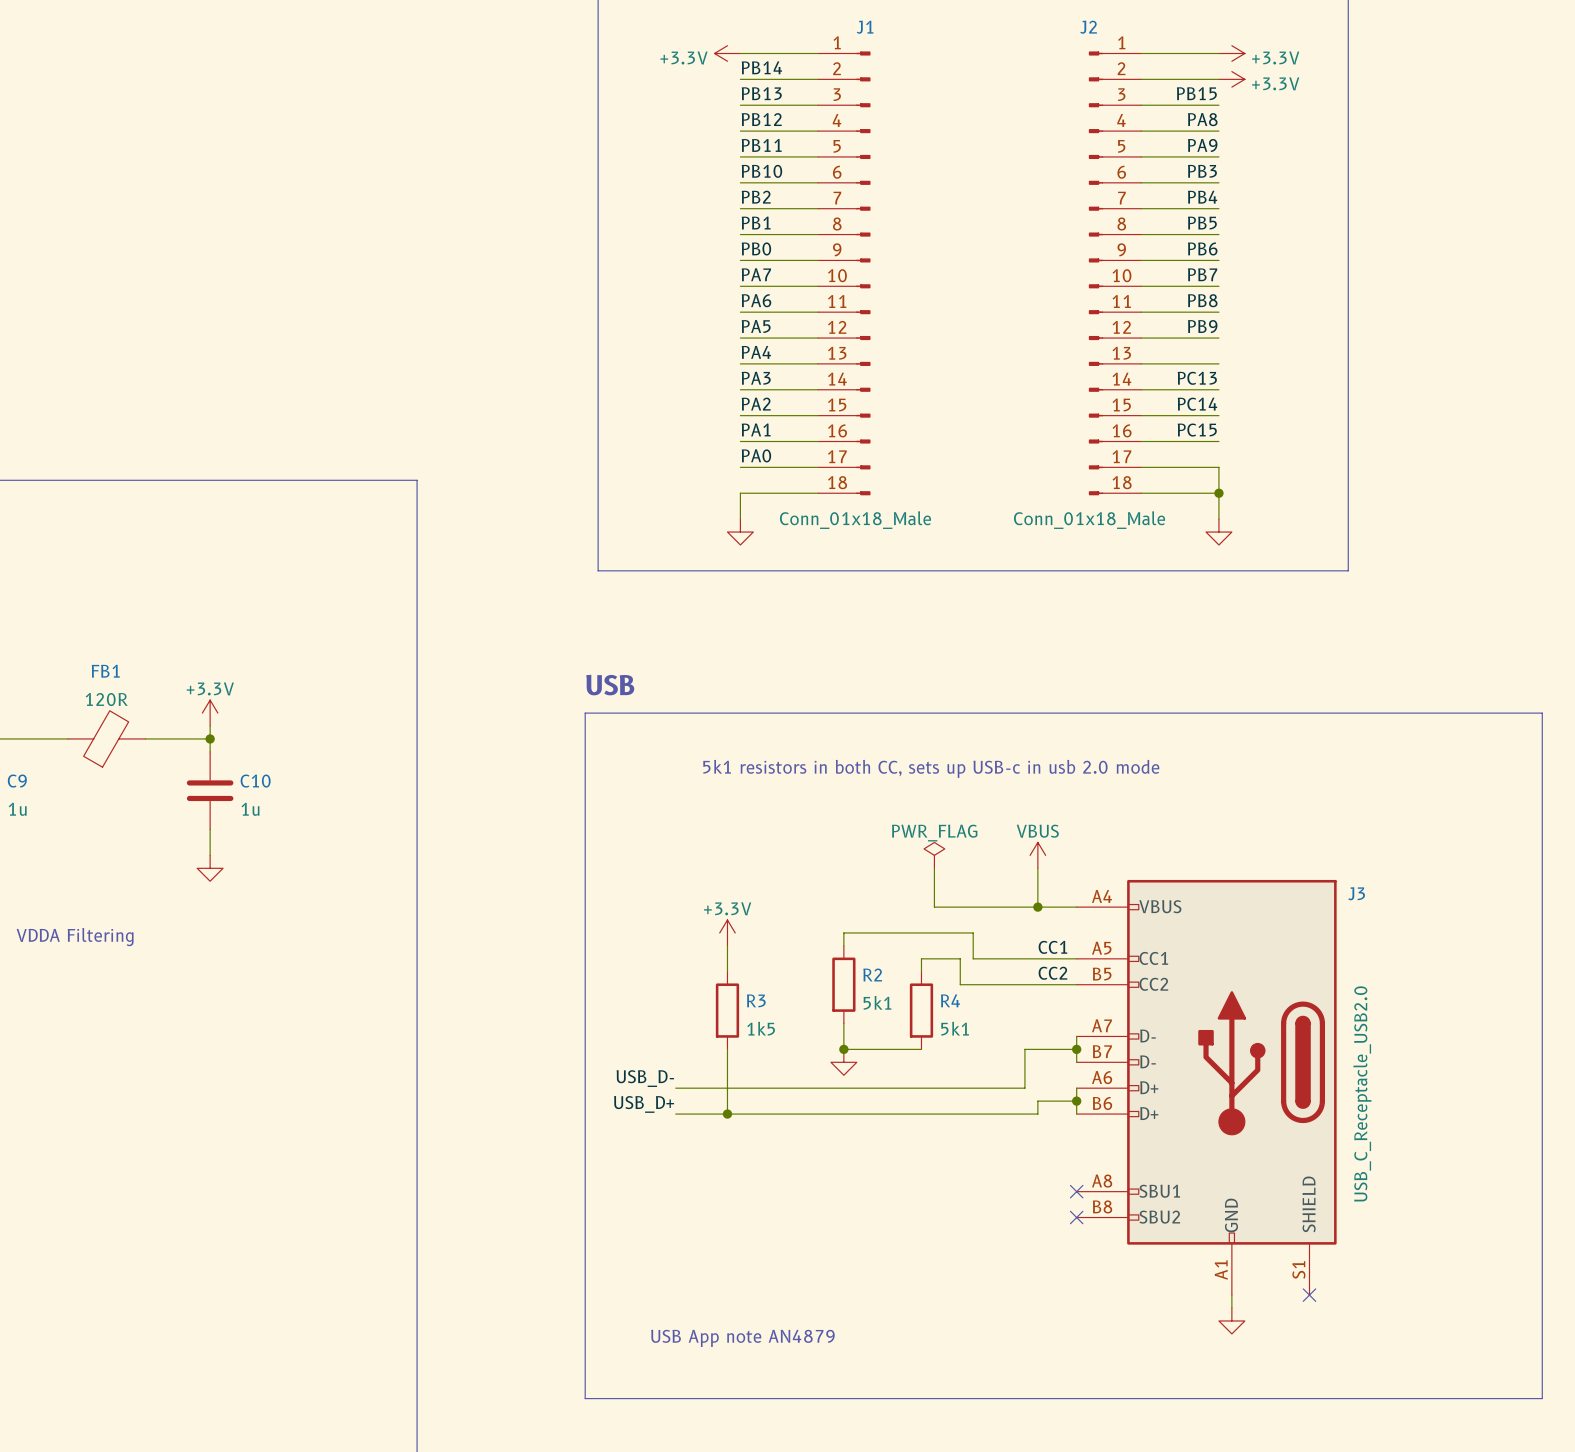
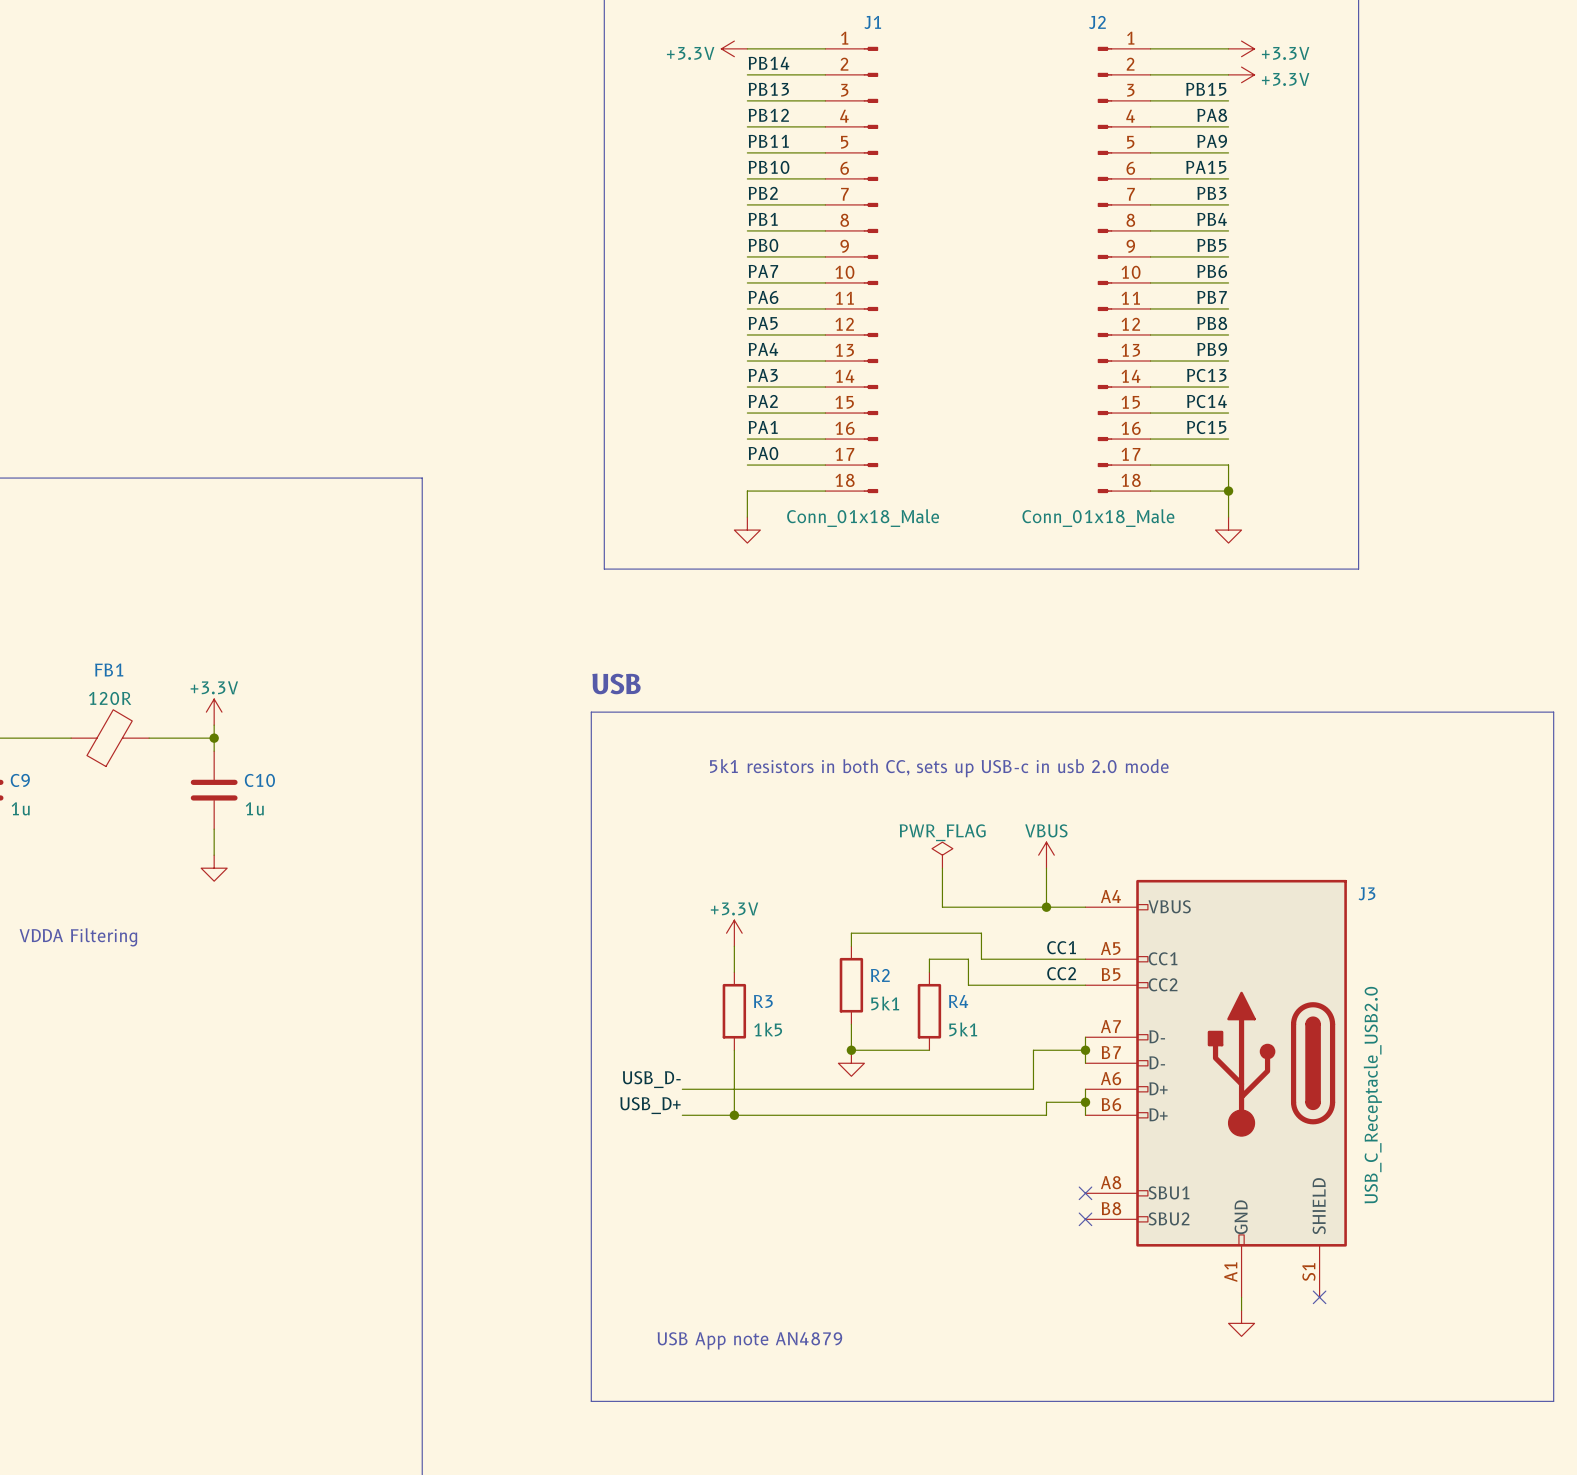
label: PB3 (1202, 171) -> PA15 (1206, 167)
label: PB4 (1202, 197) -> PB3 (1211, 193)
label: PB5 (1202, 223) -> PB4 (1212, 219)
label: PB6 (1202, 248) -> PB5 (1211, 245)
label: PB7 (1202, 274) -> PB6 (1212, 271)
label: PB8 (1202, 300) -> PB7 (1212, 297)
label: PB9 (1202, 326) -> PB8 (1212, 323)
label: none -> PB9 (1212, 349)

